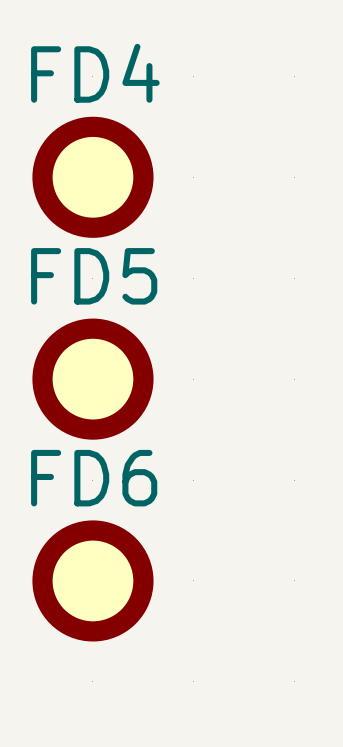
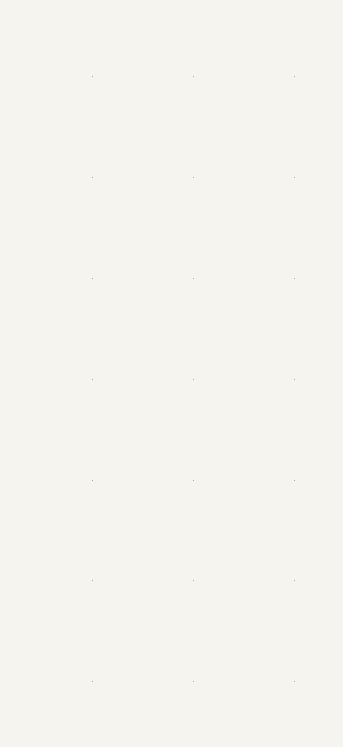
FD4: (92, 177) -> none
FD5: (92, 379) -> none
FD6: (92, 580) -> none

